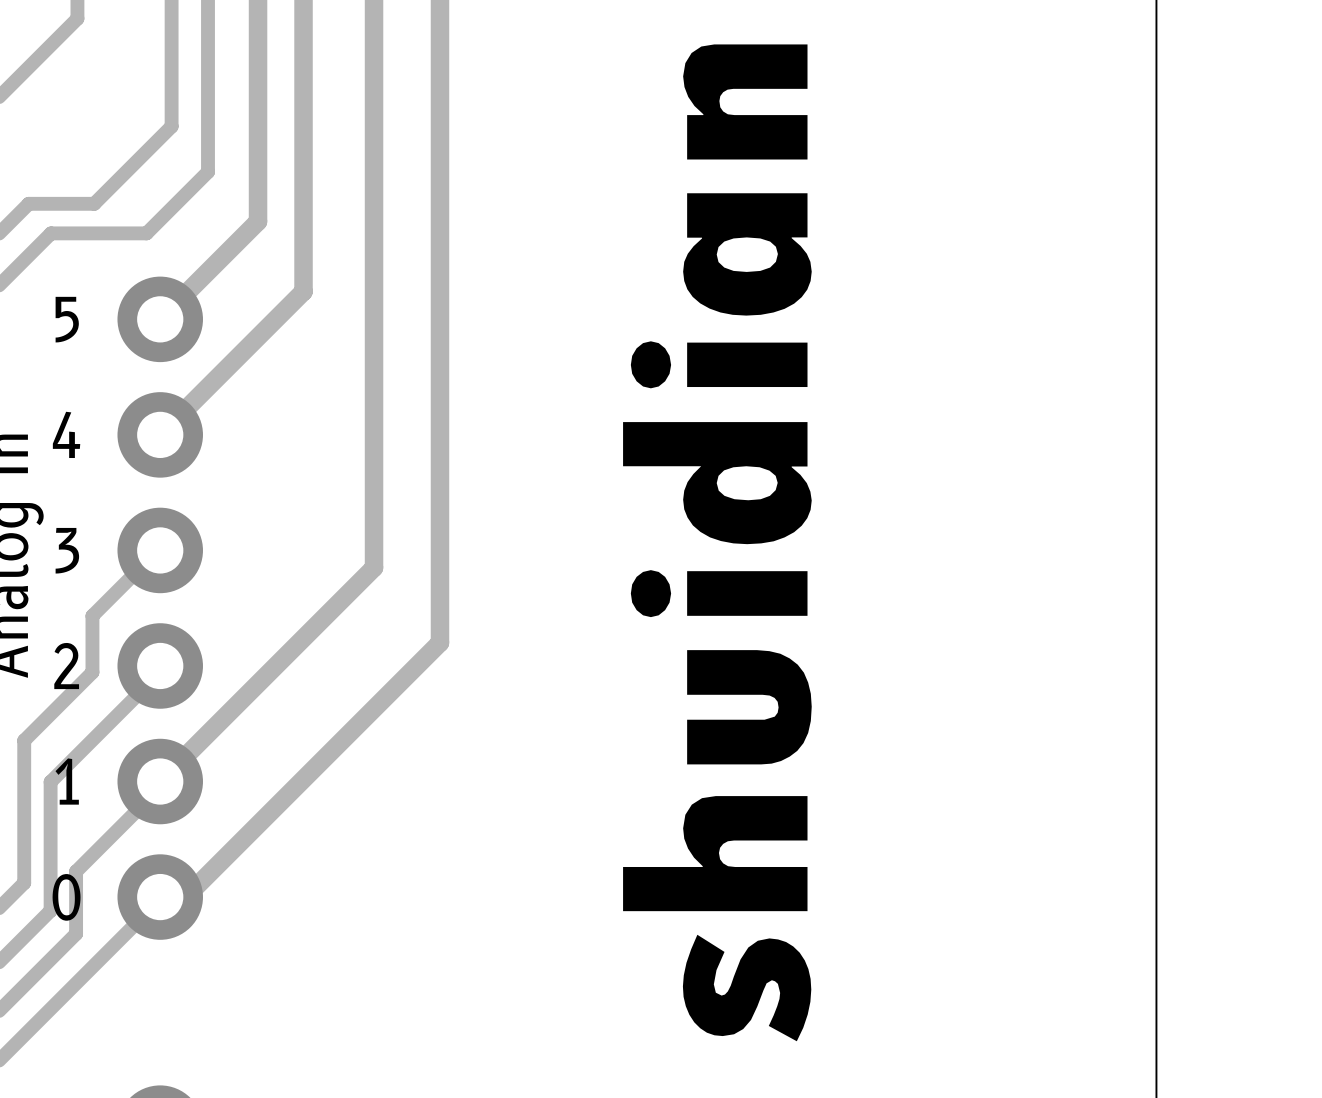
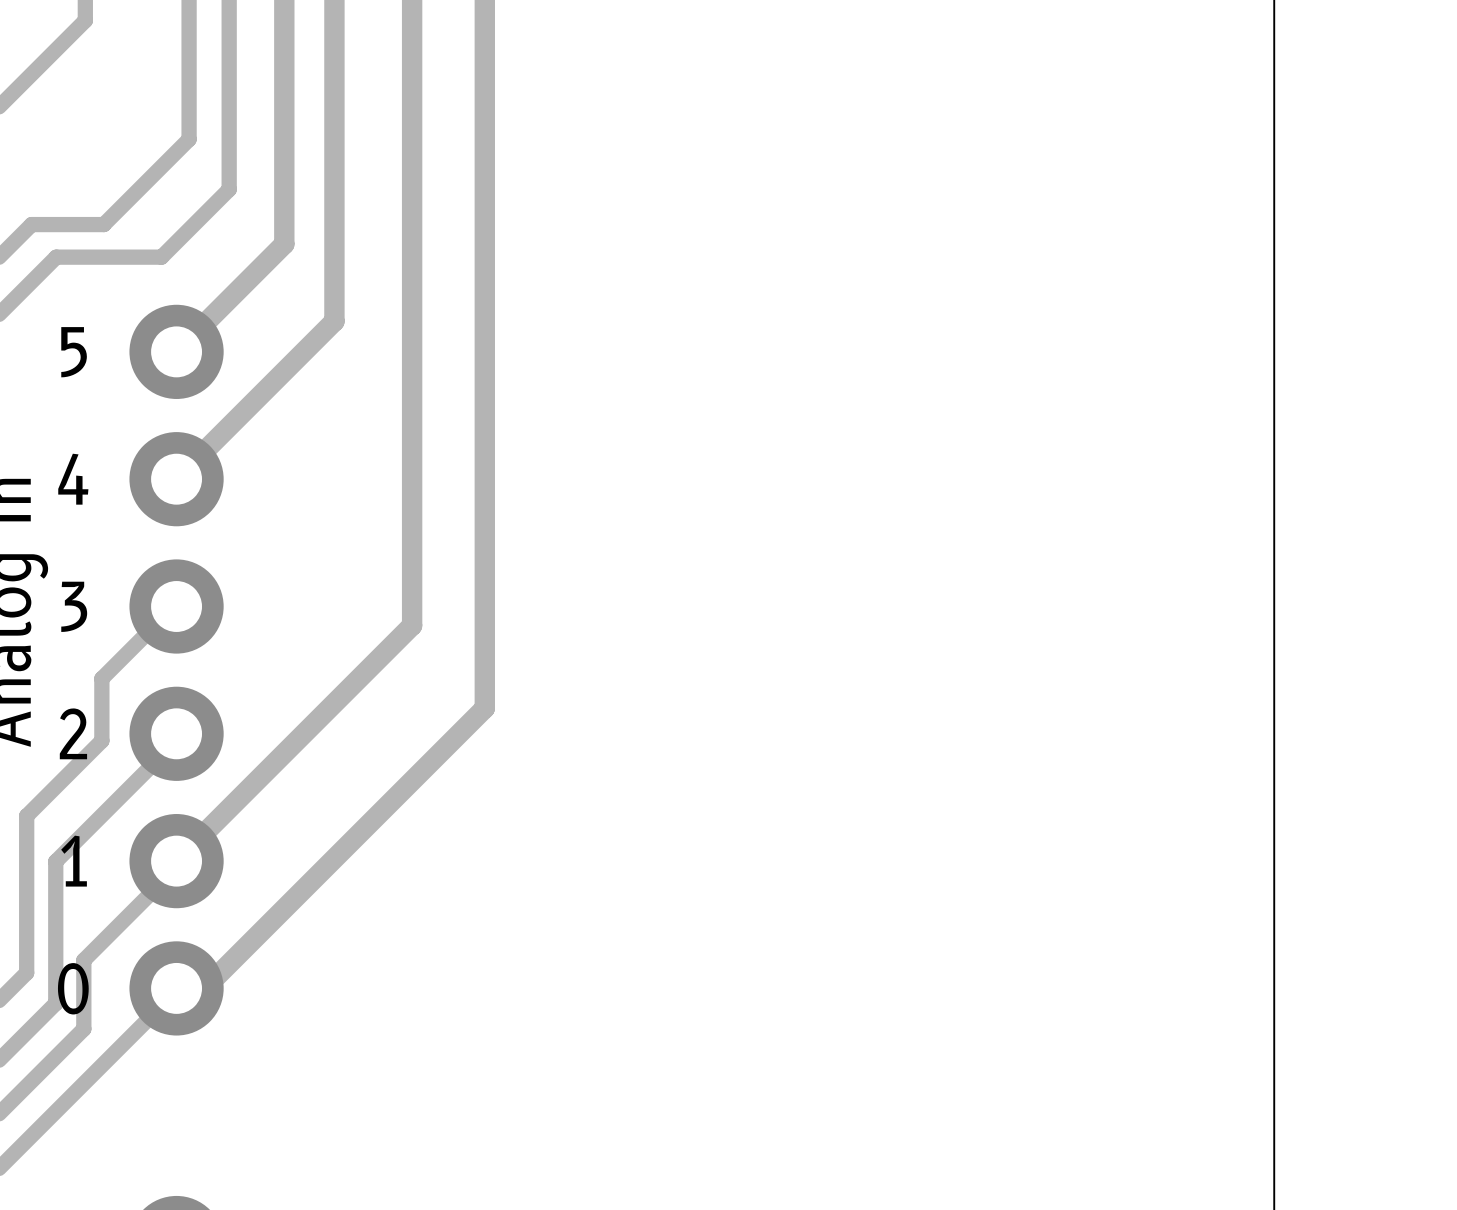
drawing: [623, 44, 812, 1042] -> none

